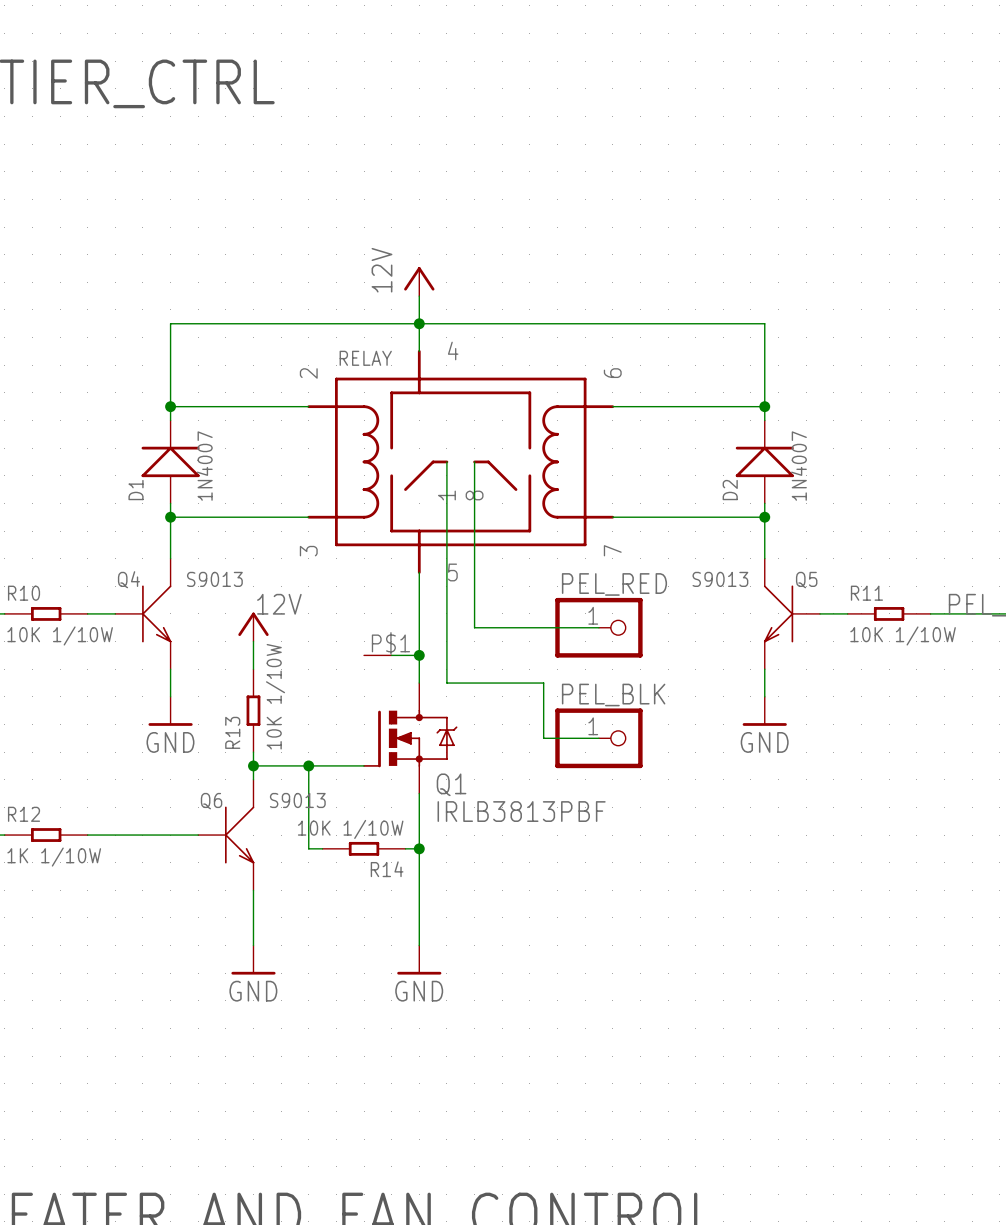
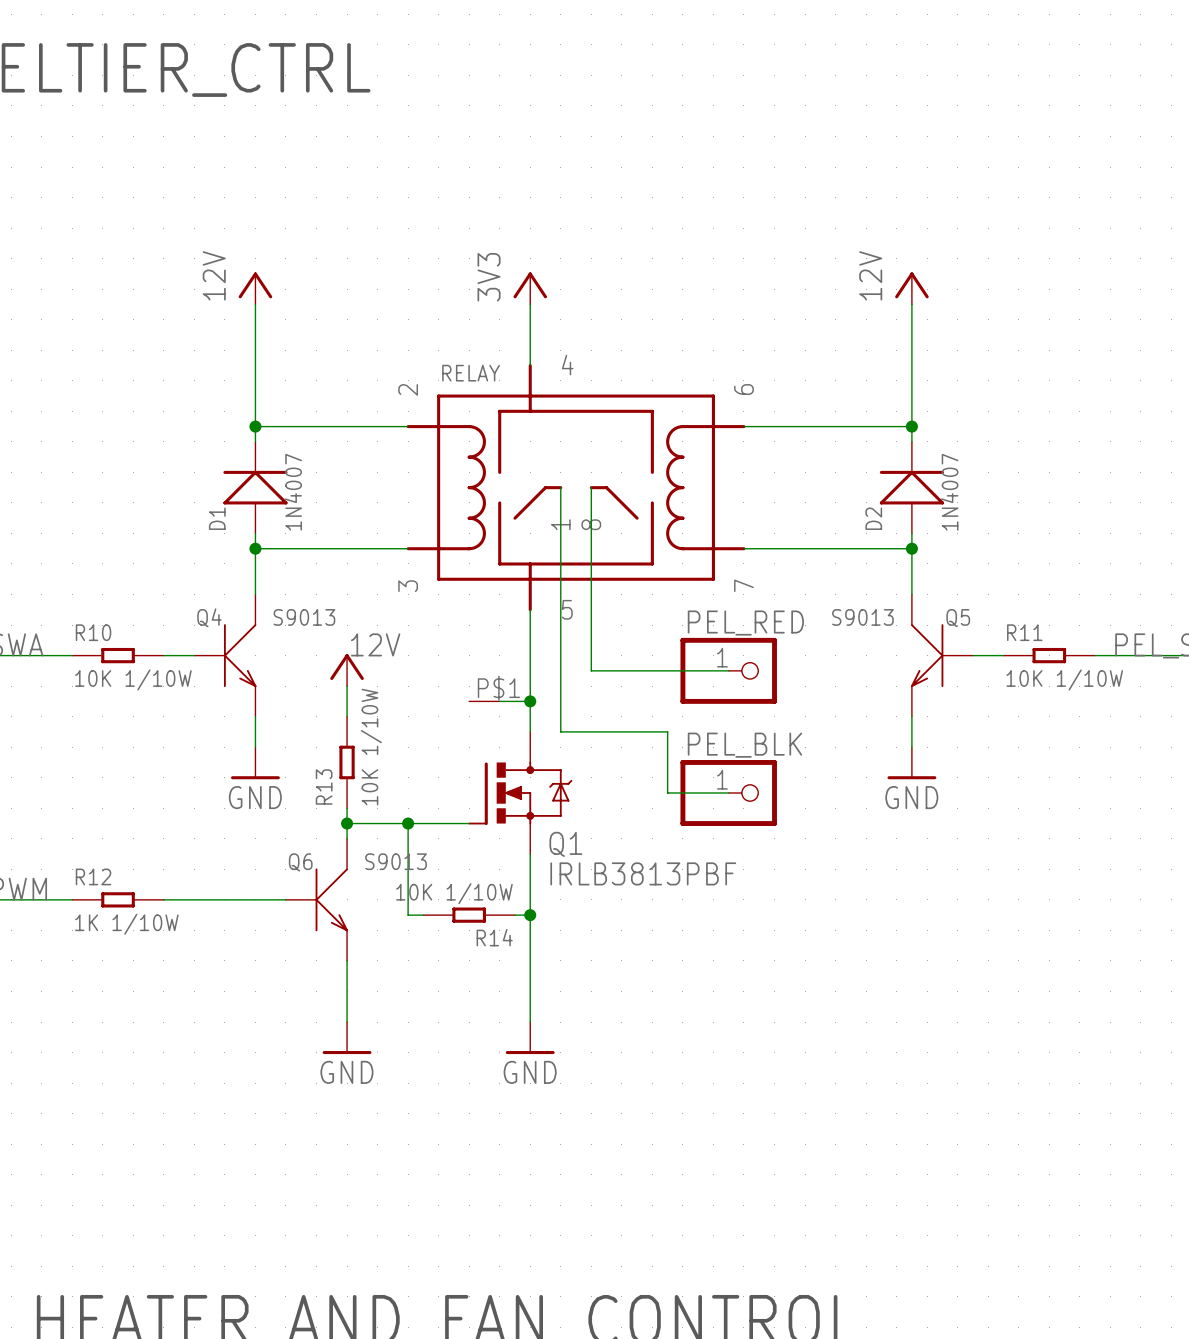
power symbol: none -> 12V (255, 288)
power symbol: 12V (419, 281) -> 3V3 (530, 288)
power symbol: none -> 12V (911, 288)
wire: none -> (911, 304) (911, 334)
wire: (170, 323) (764, 323) -> (255, 334) (255, 304)
junction: (419, 323) -> none

